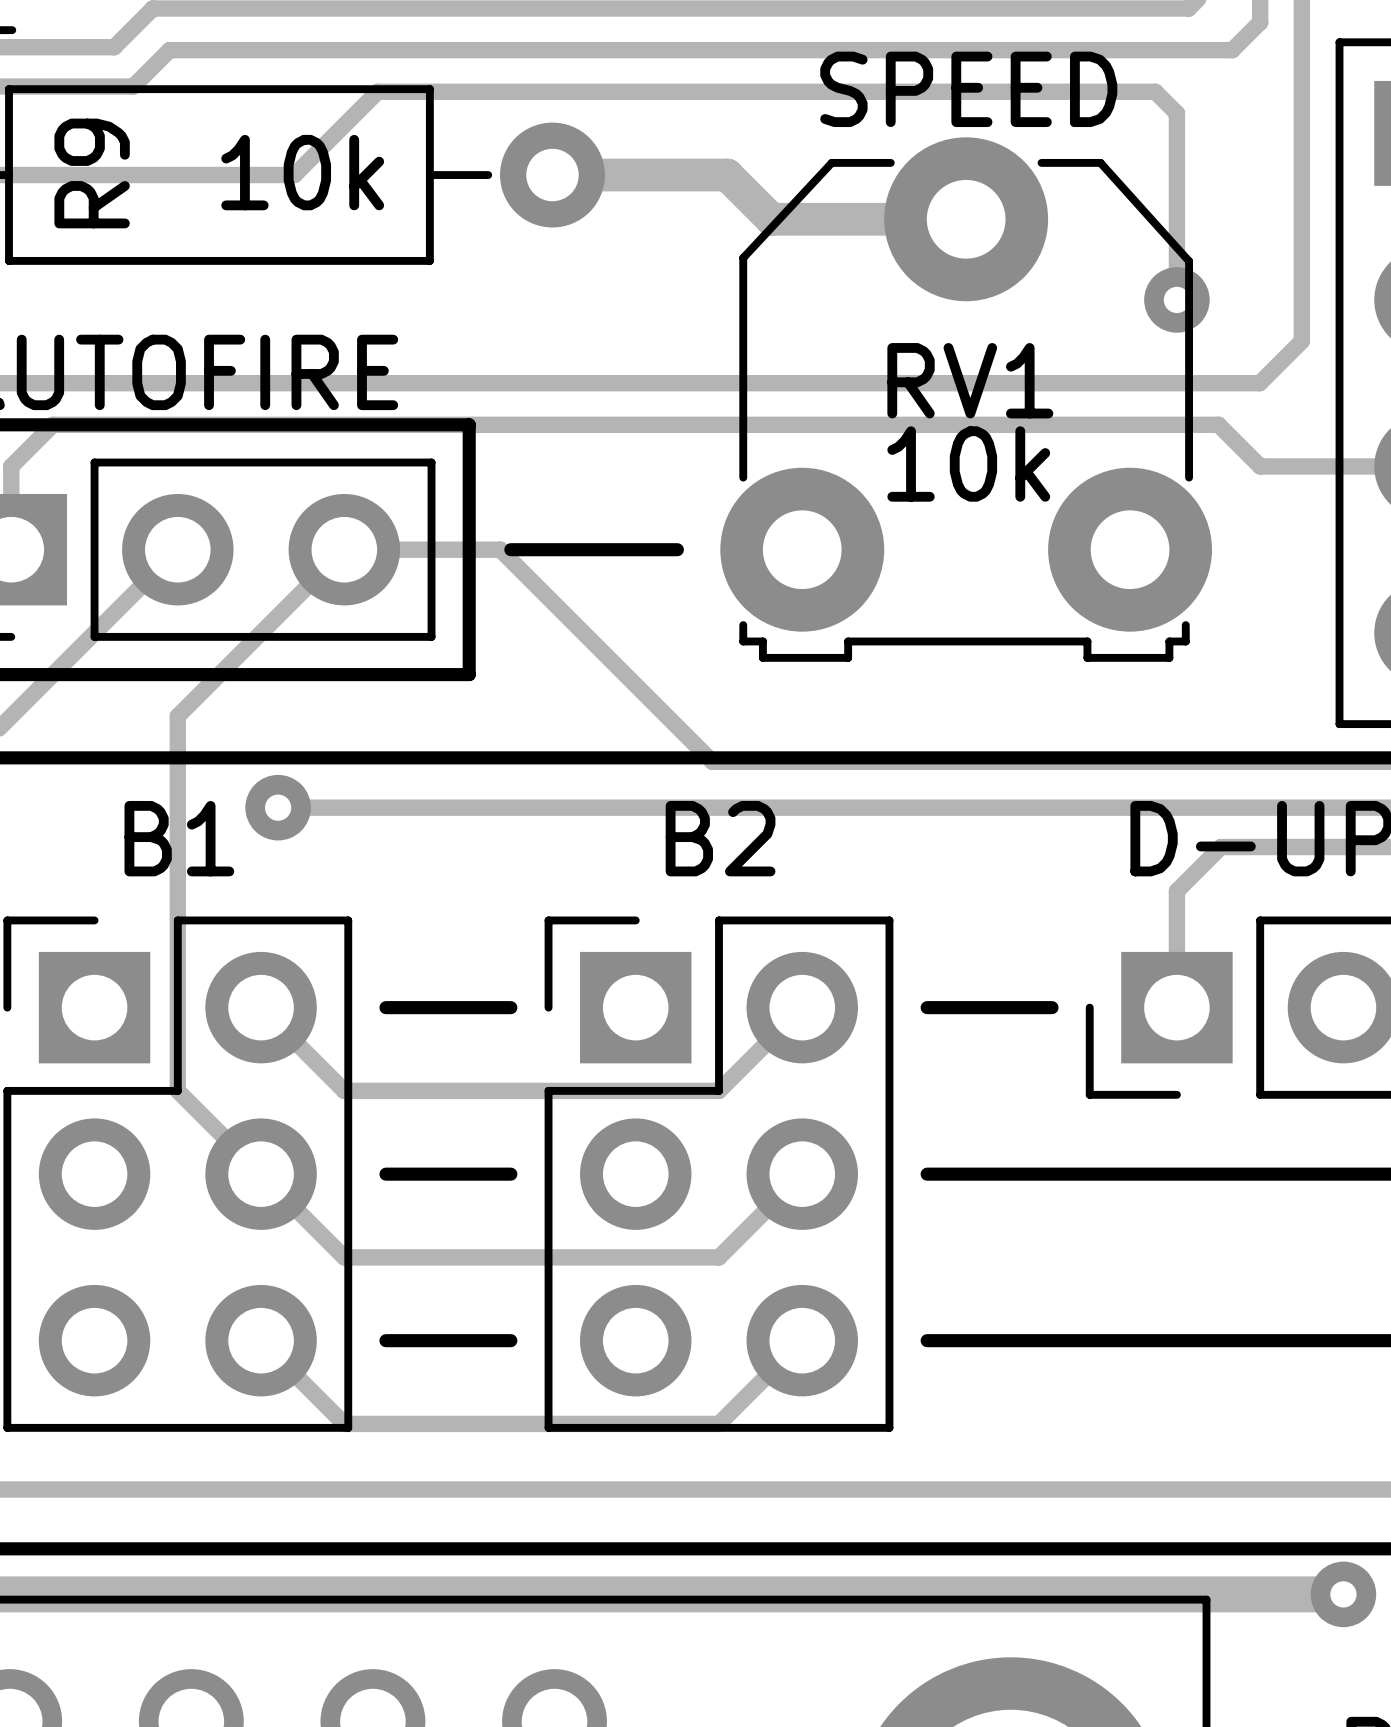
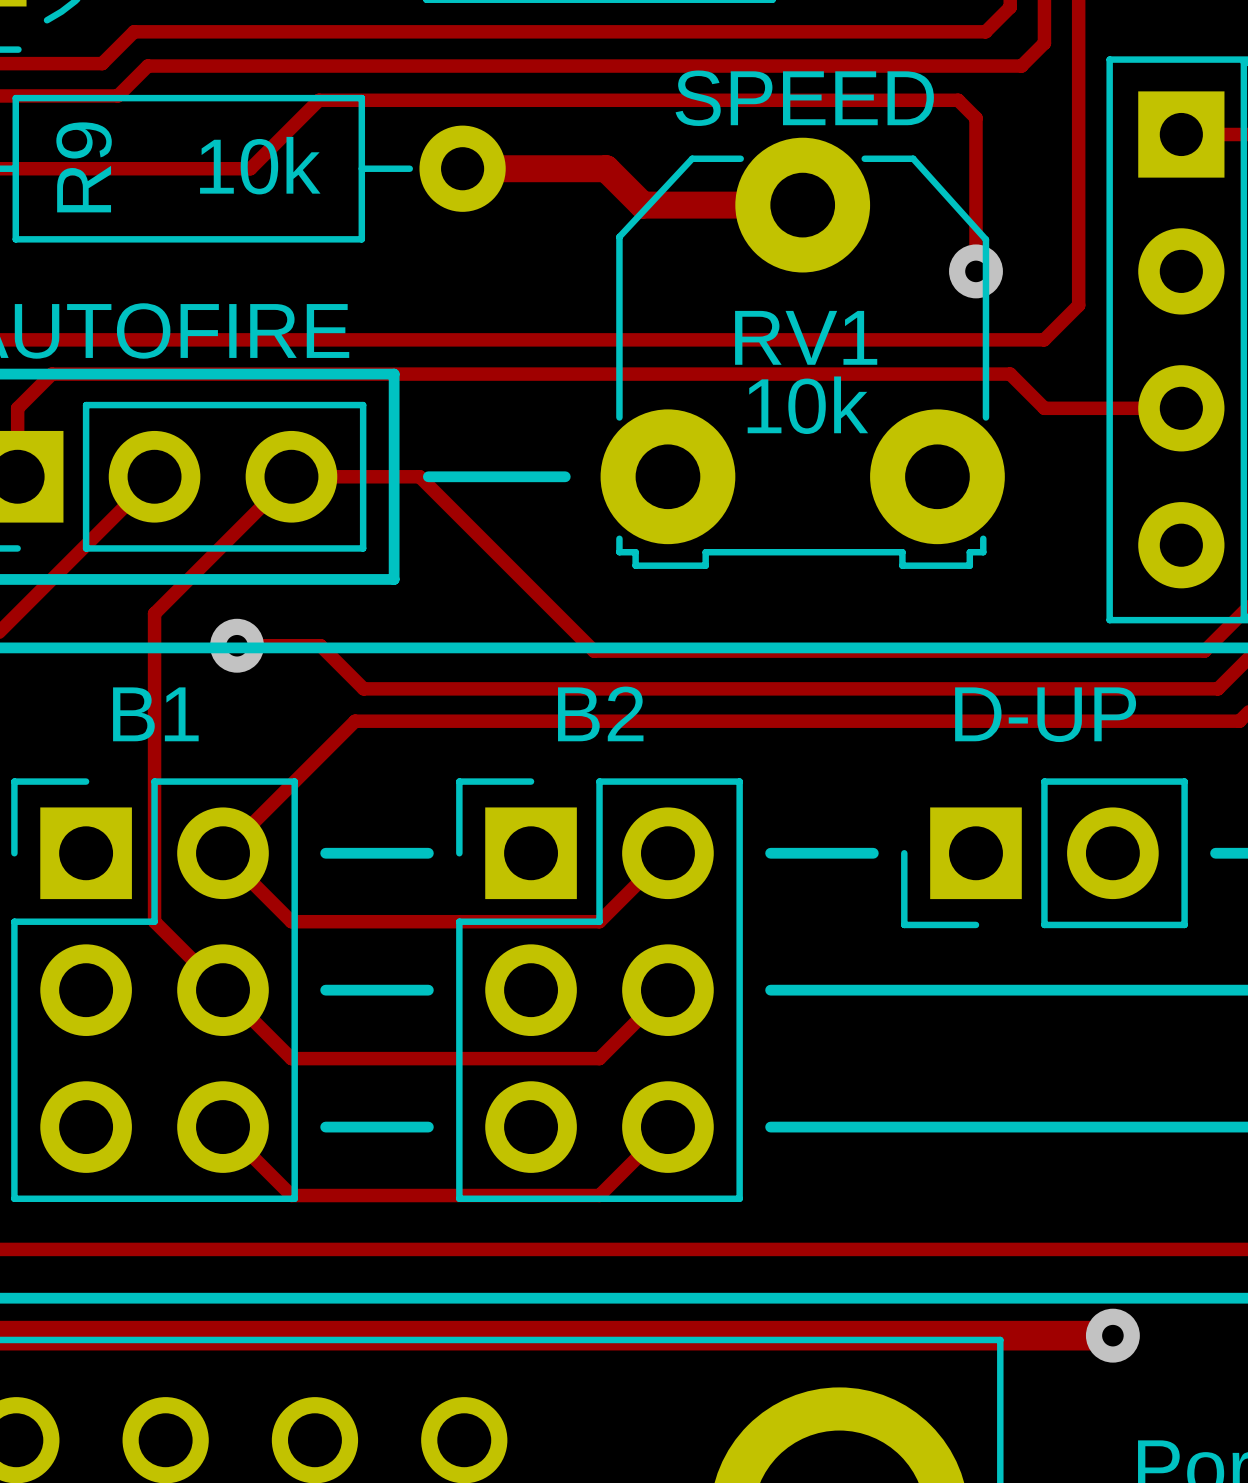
track: (278, 807) (432, 807) -> (237, 645) (320, 645) (363, 688)
via position: (278, 807) -> (237, 645)
track: (1220, 847) (1176, 891) (1176, 1007) -> (1012, 721) (355, 721) (223, 853)

